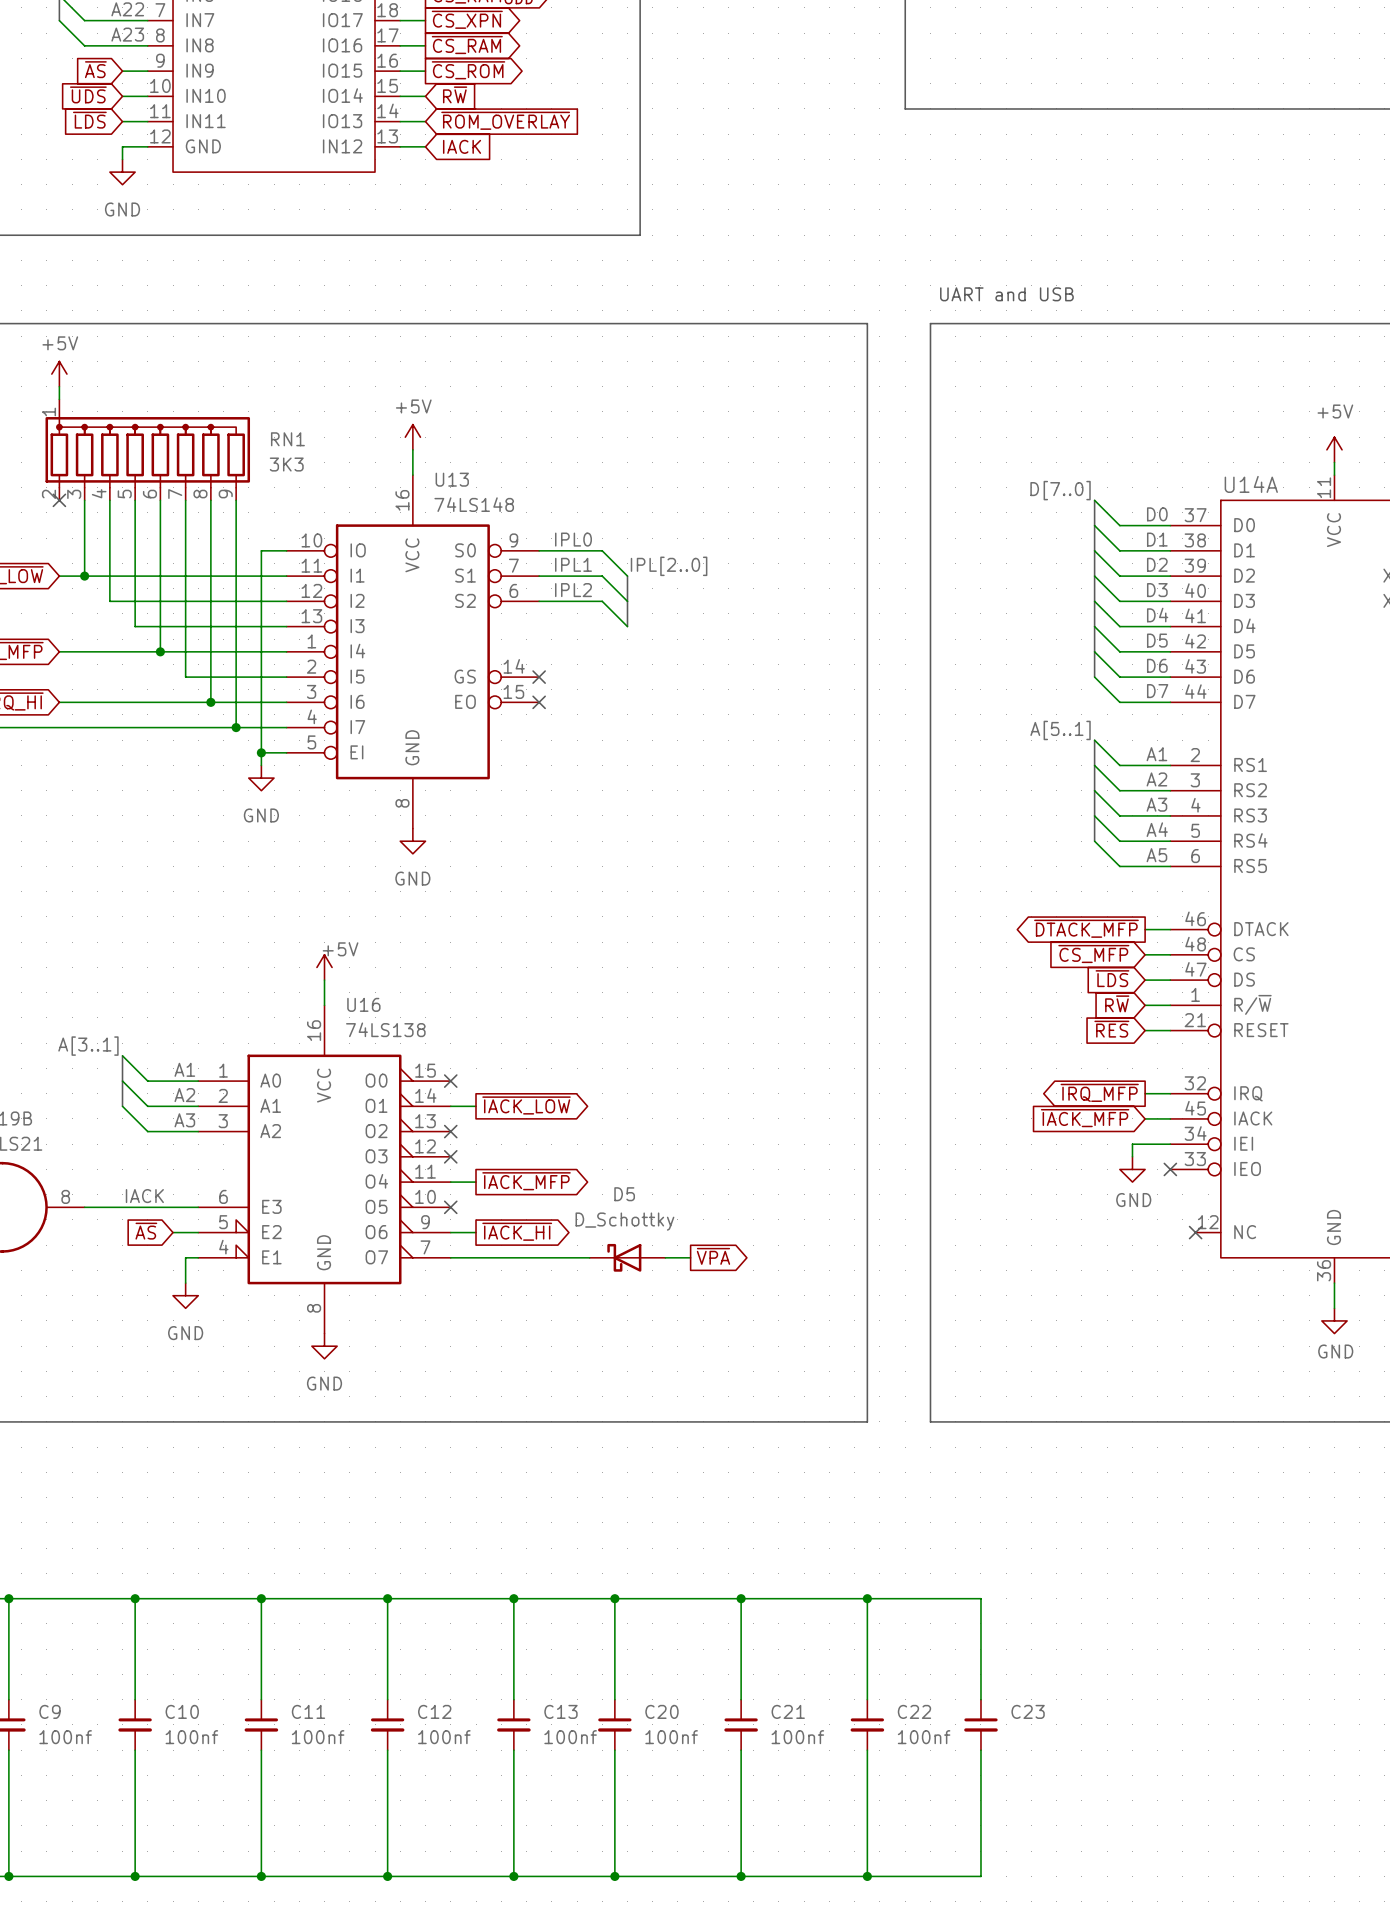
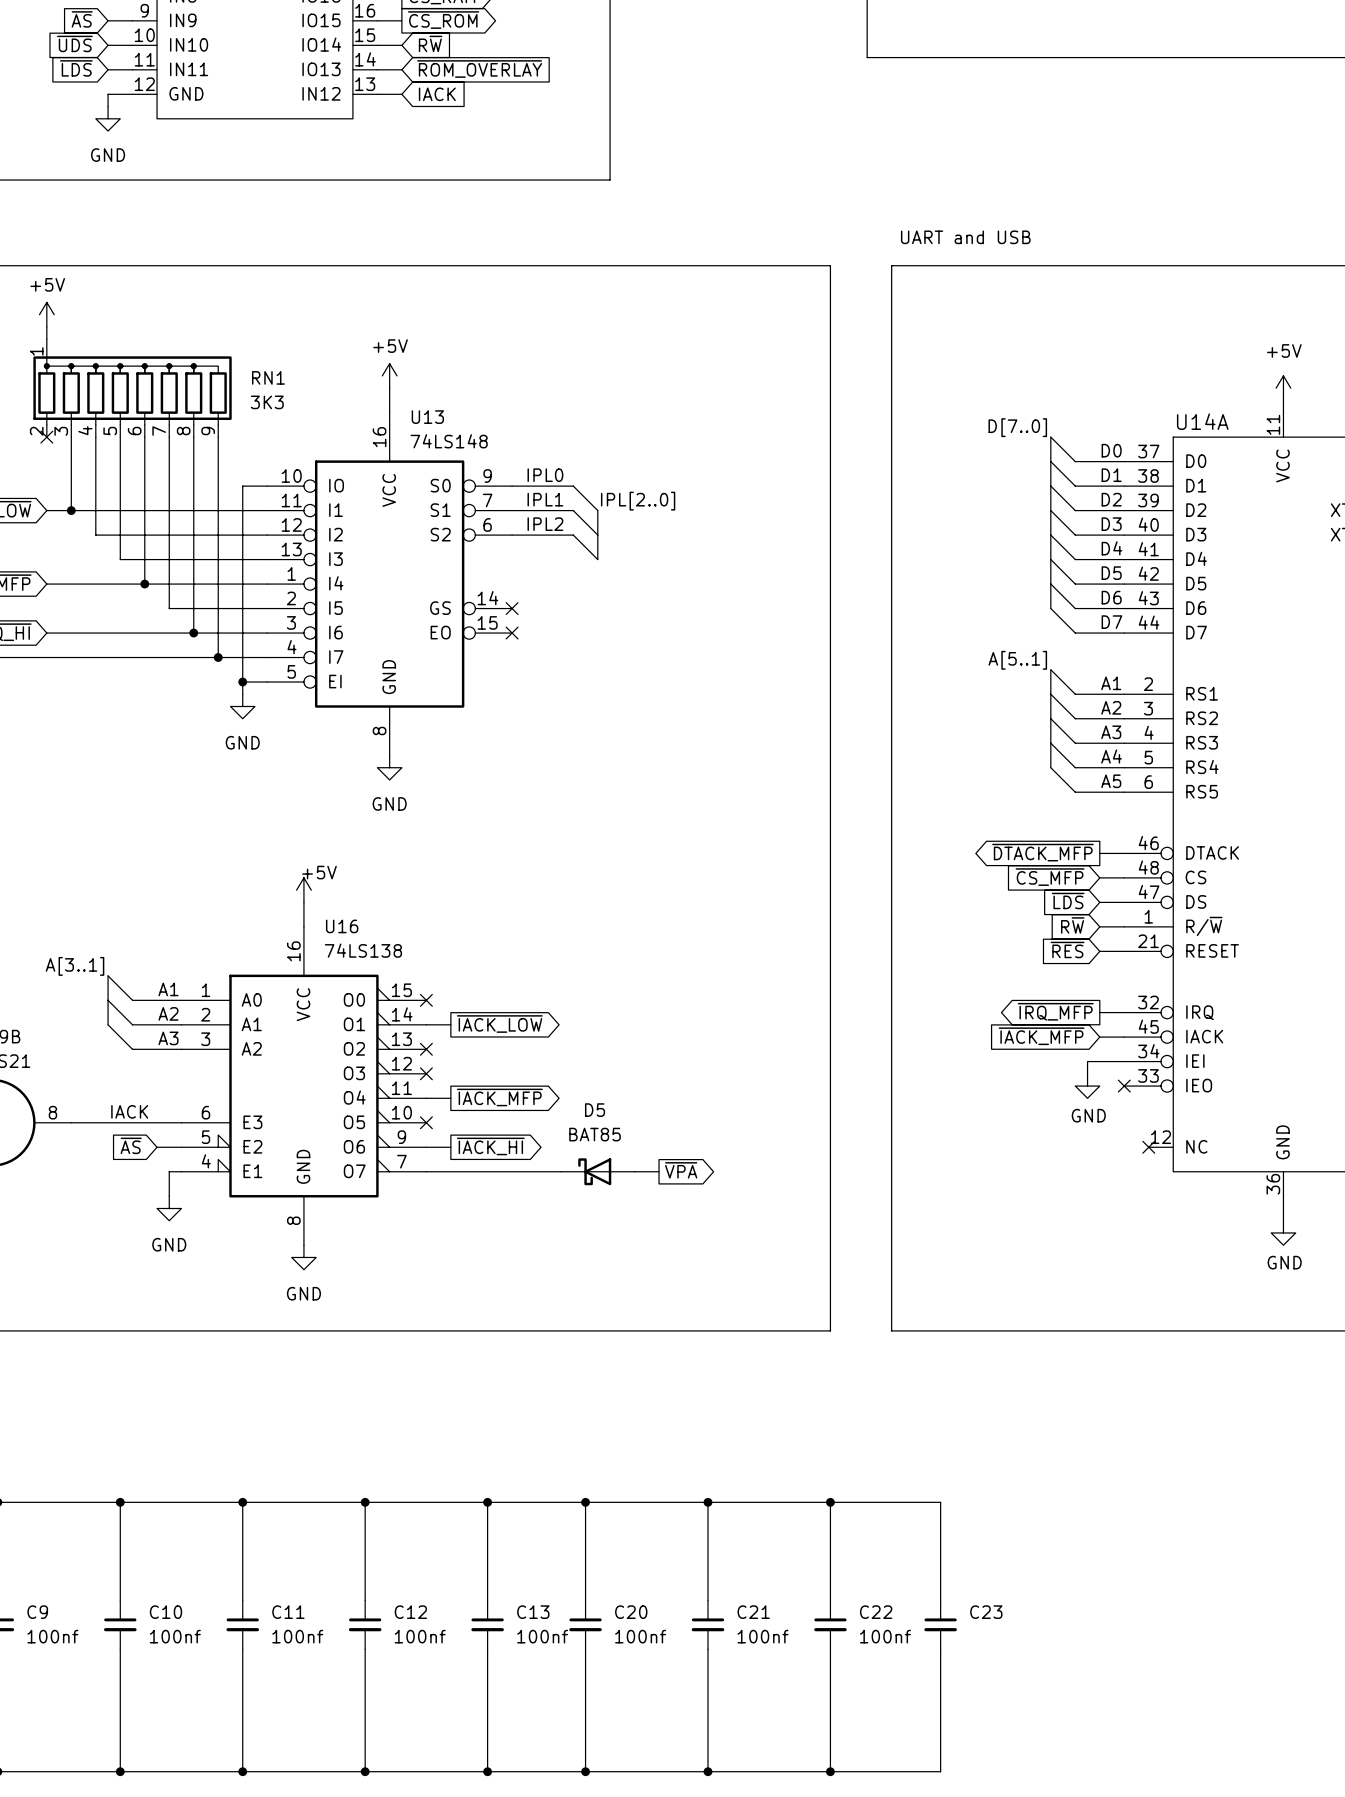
D5 value: D_Schottky (624, 1221) -> BAT85 (595, 1134)

